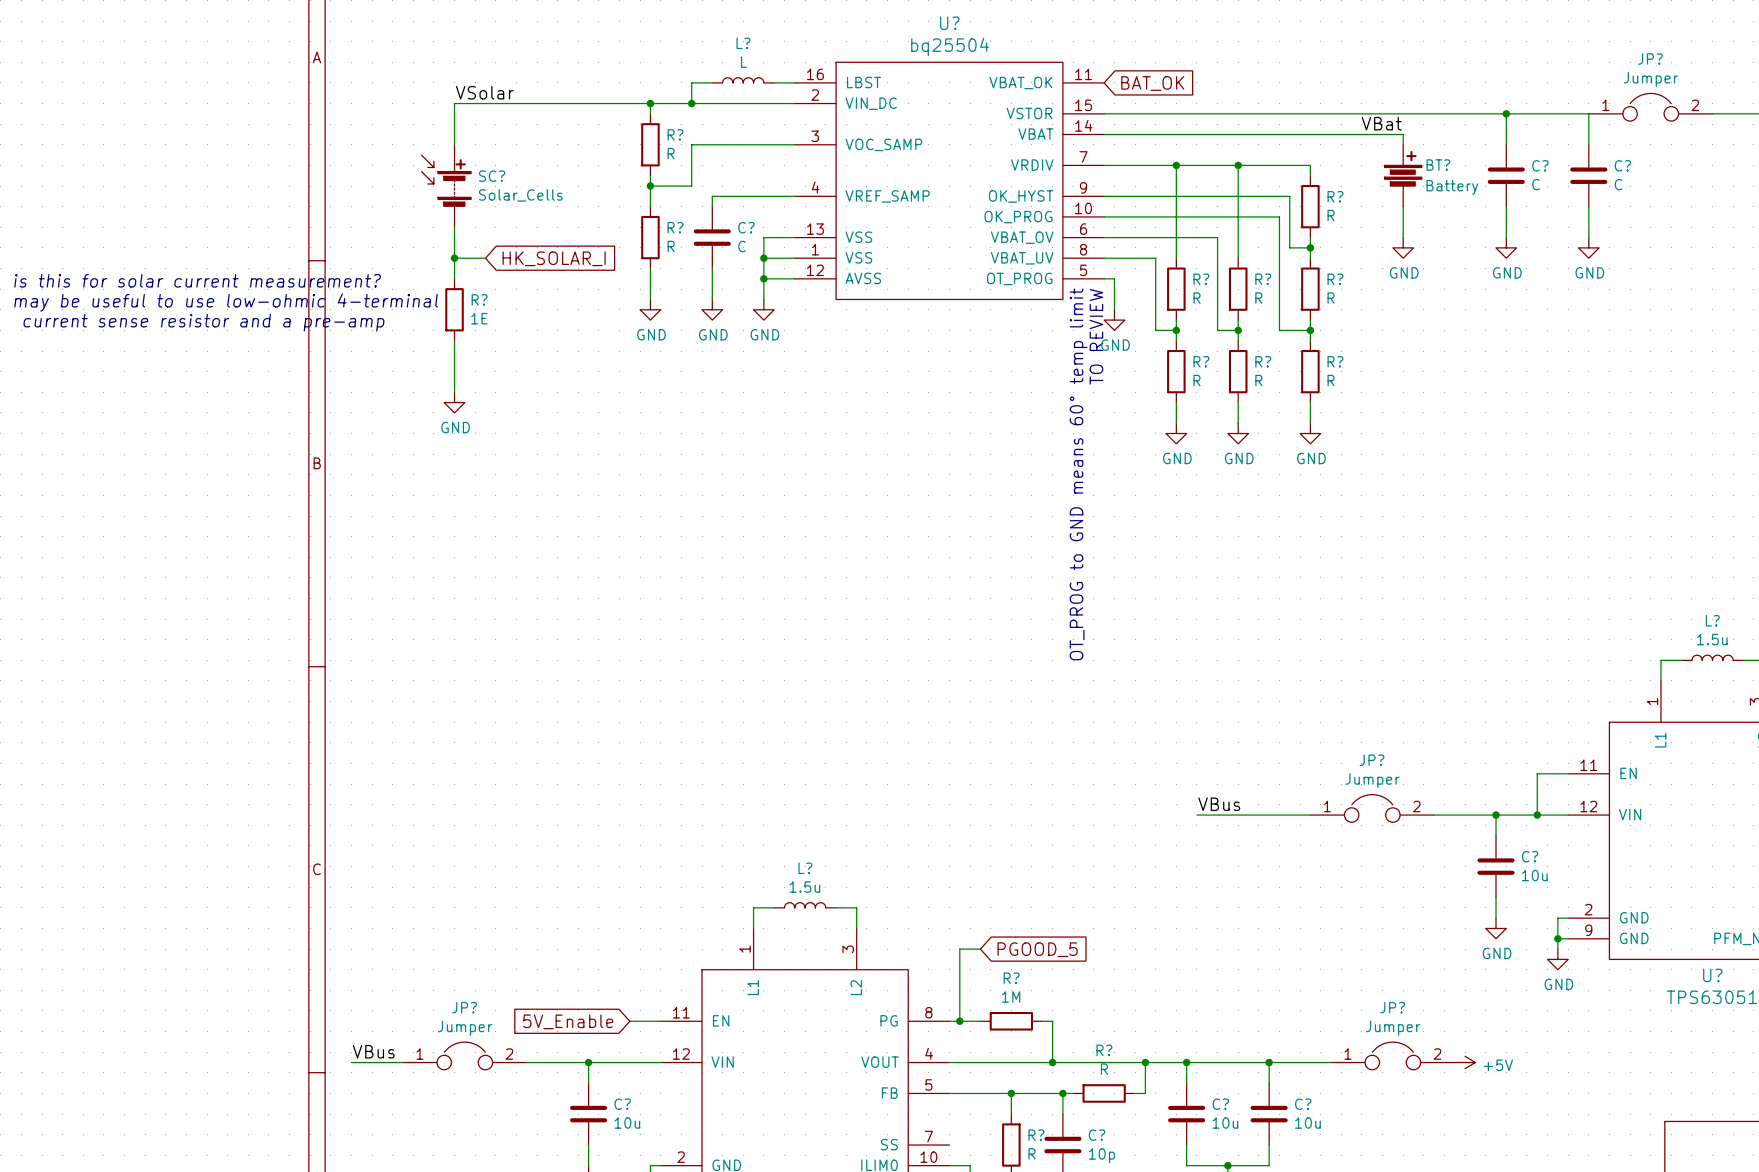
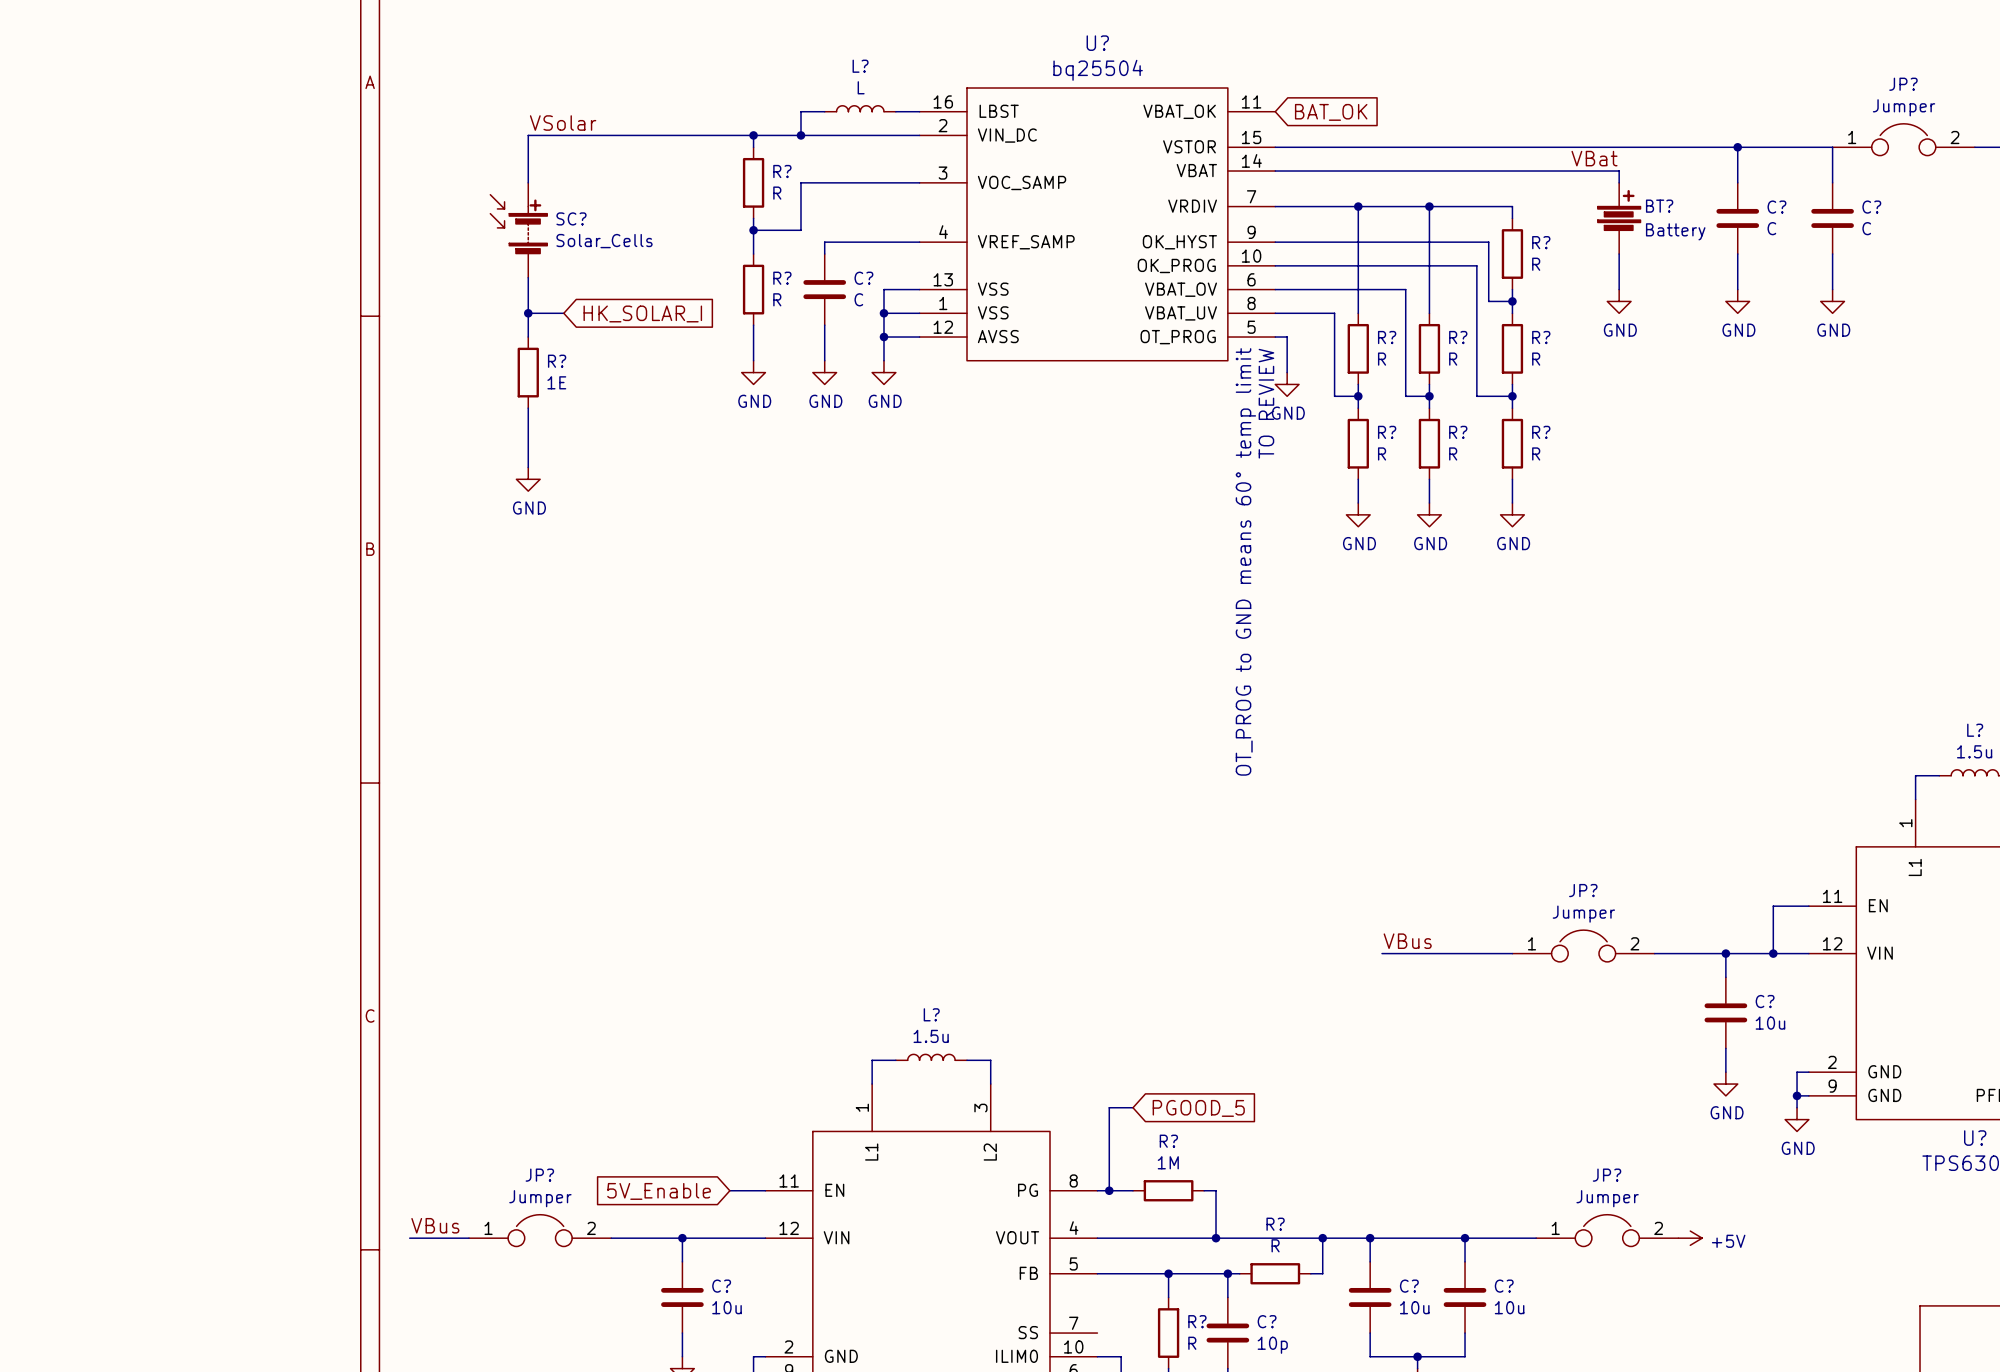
text: is this for solar current measurement? (197, 280) -> none
text: may be useful to use low-ohmic 4-terminal (226, 302) -> none
text: current sense resistor and a pre-amp (203, 322) -> none

